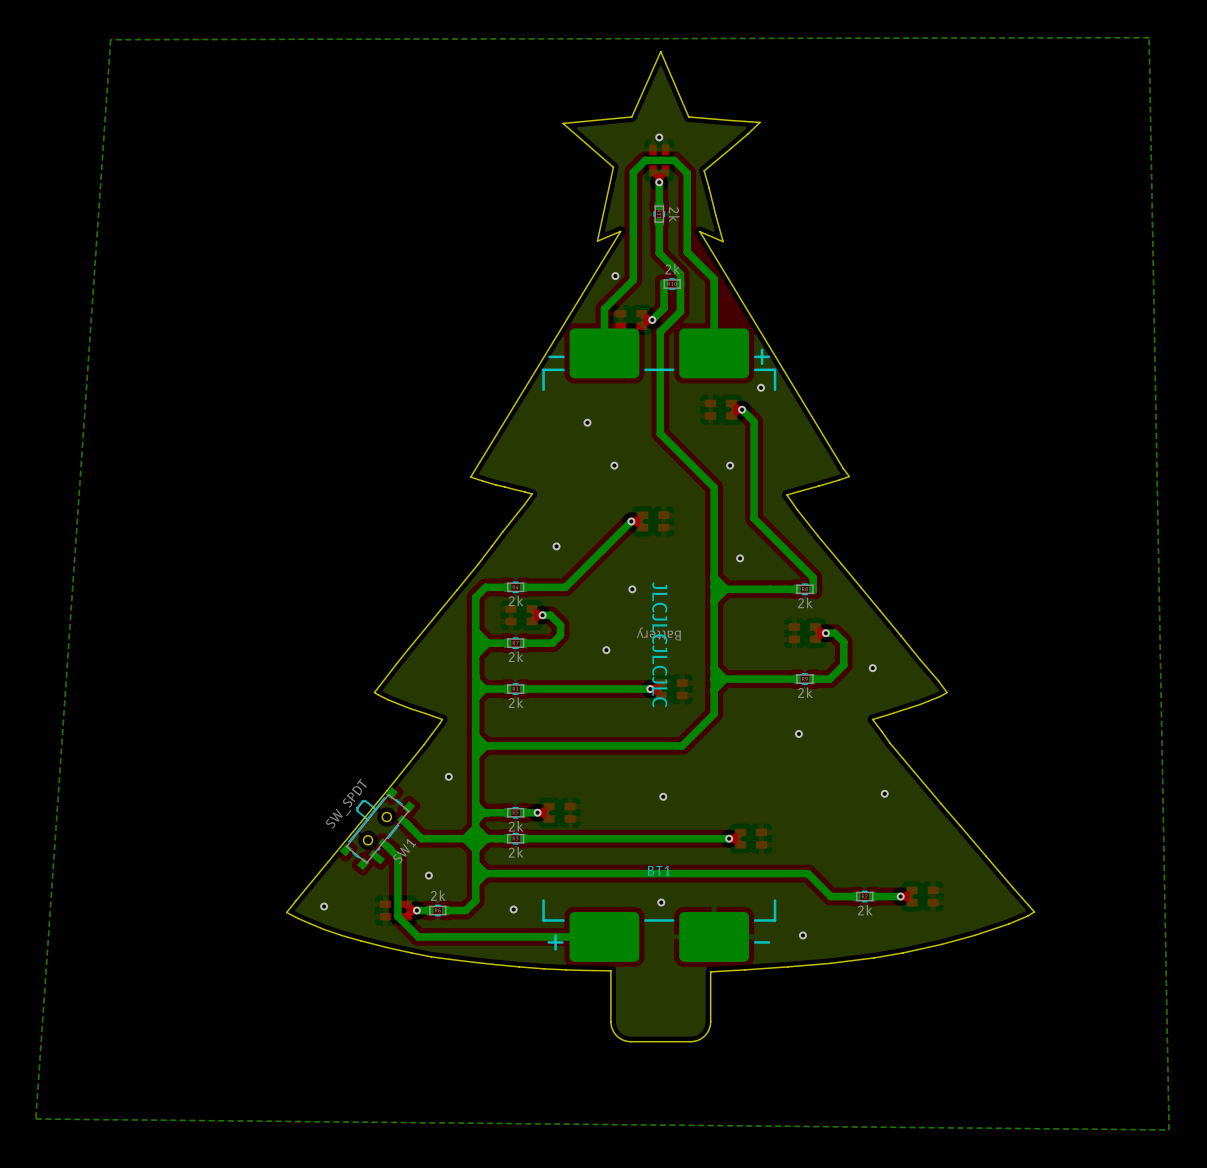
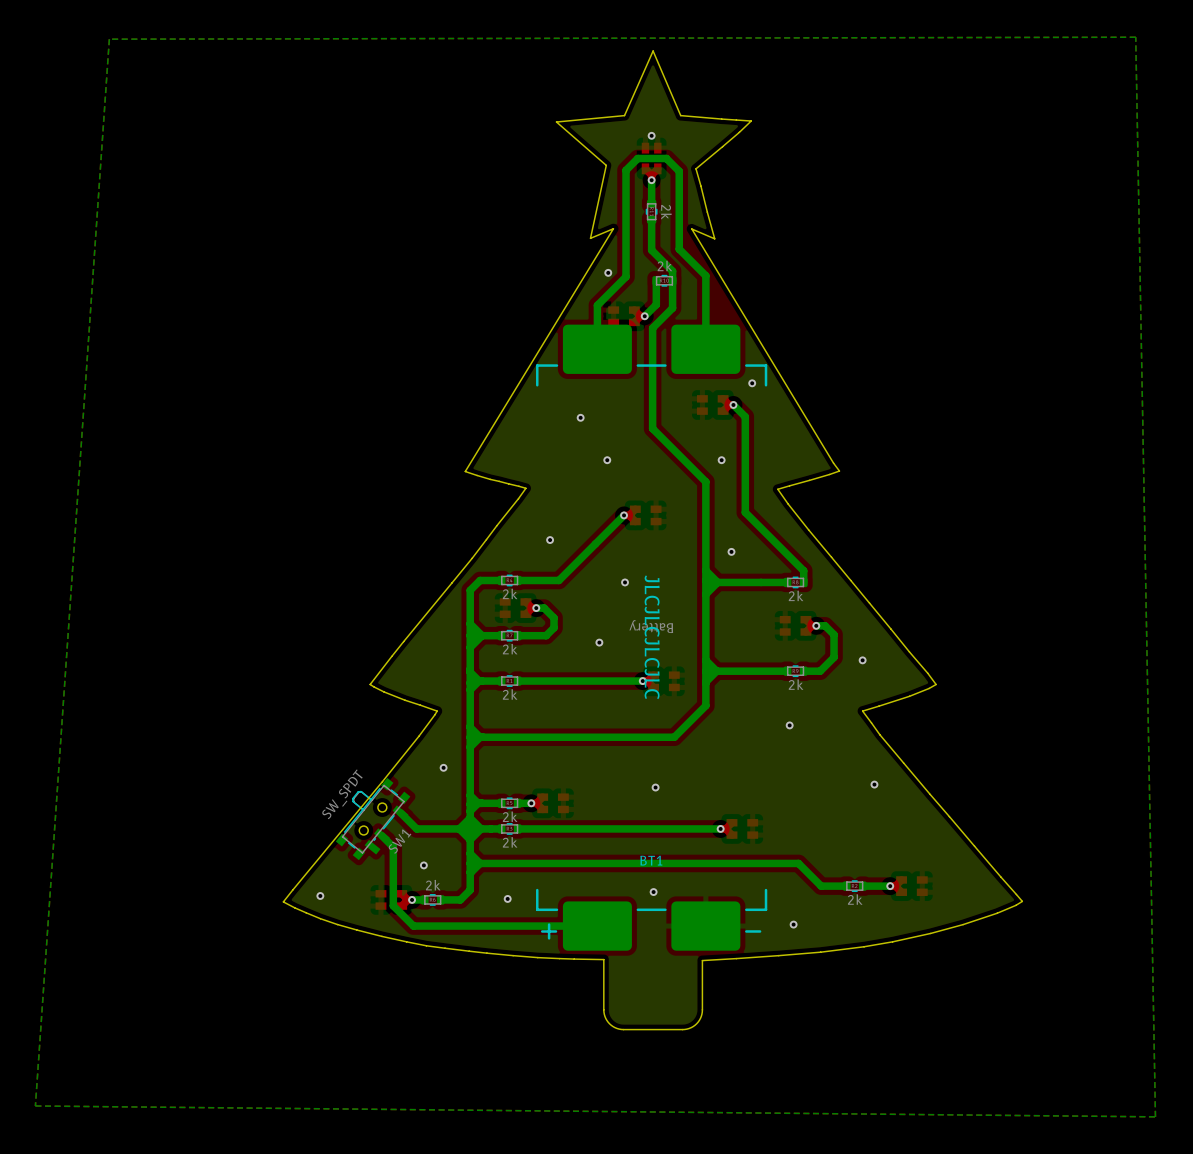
line: (762, 349) (762, 363) -> none
line: (563, 356) (549, 356) -> none
line: (769, 356) (755, 356) -> none

